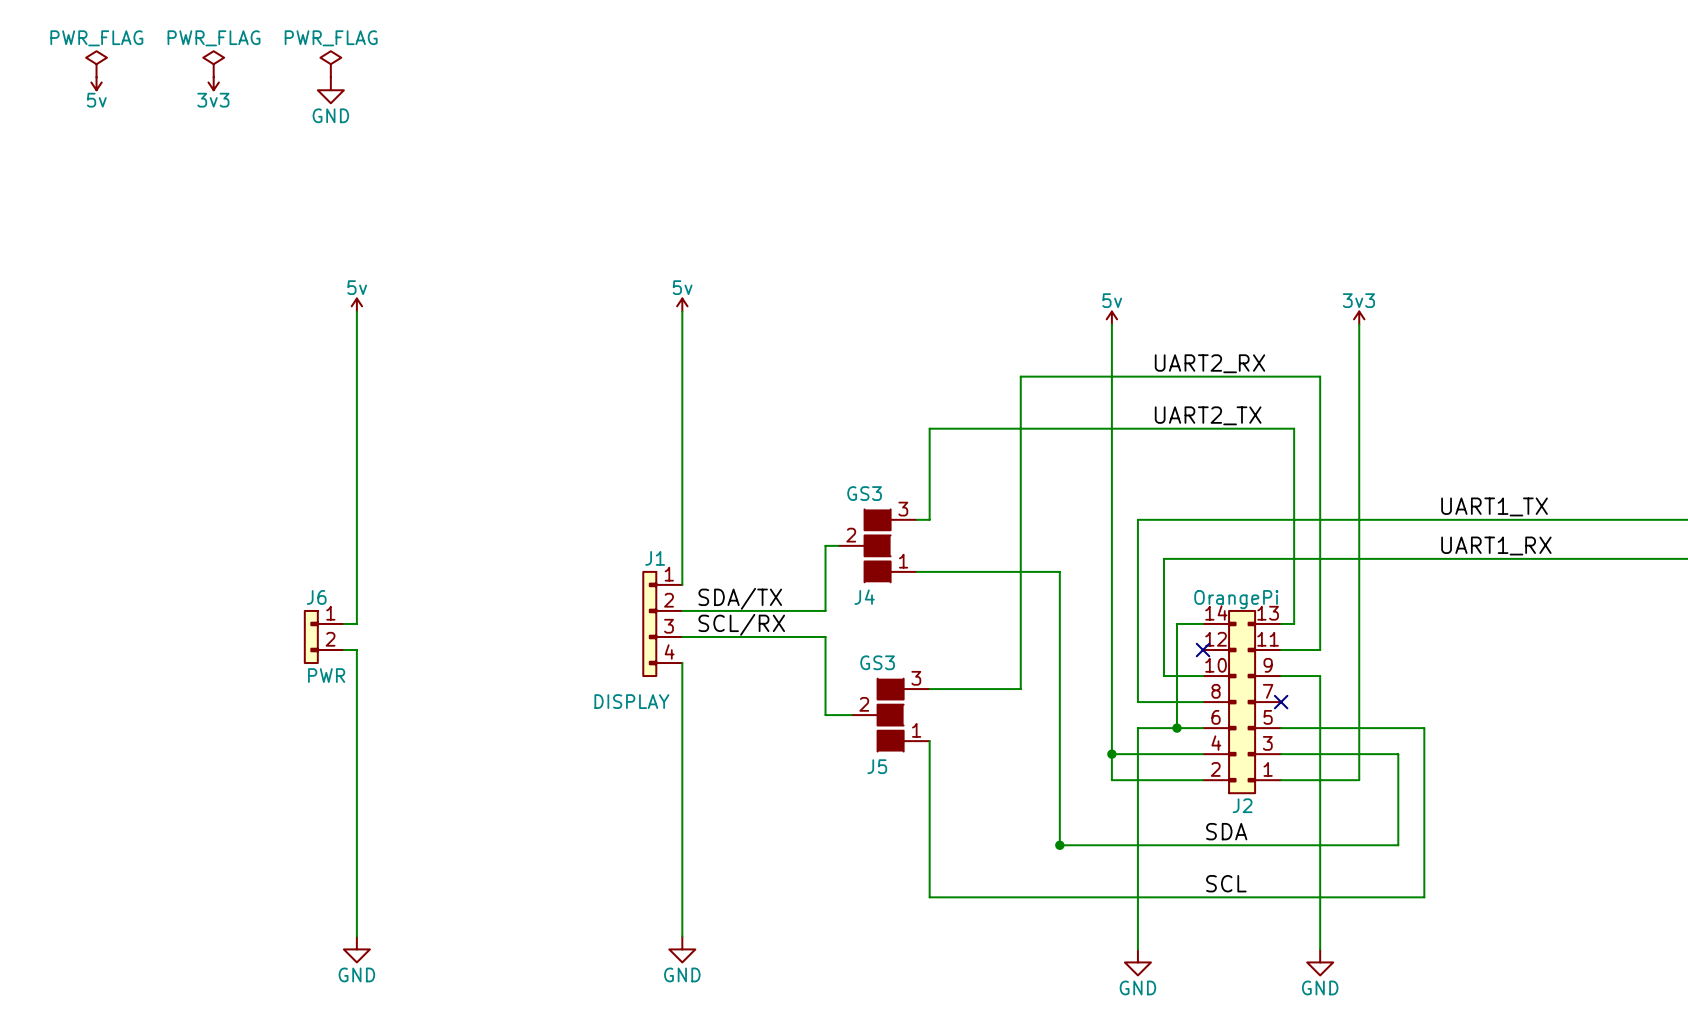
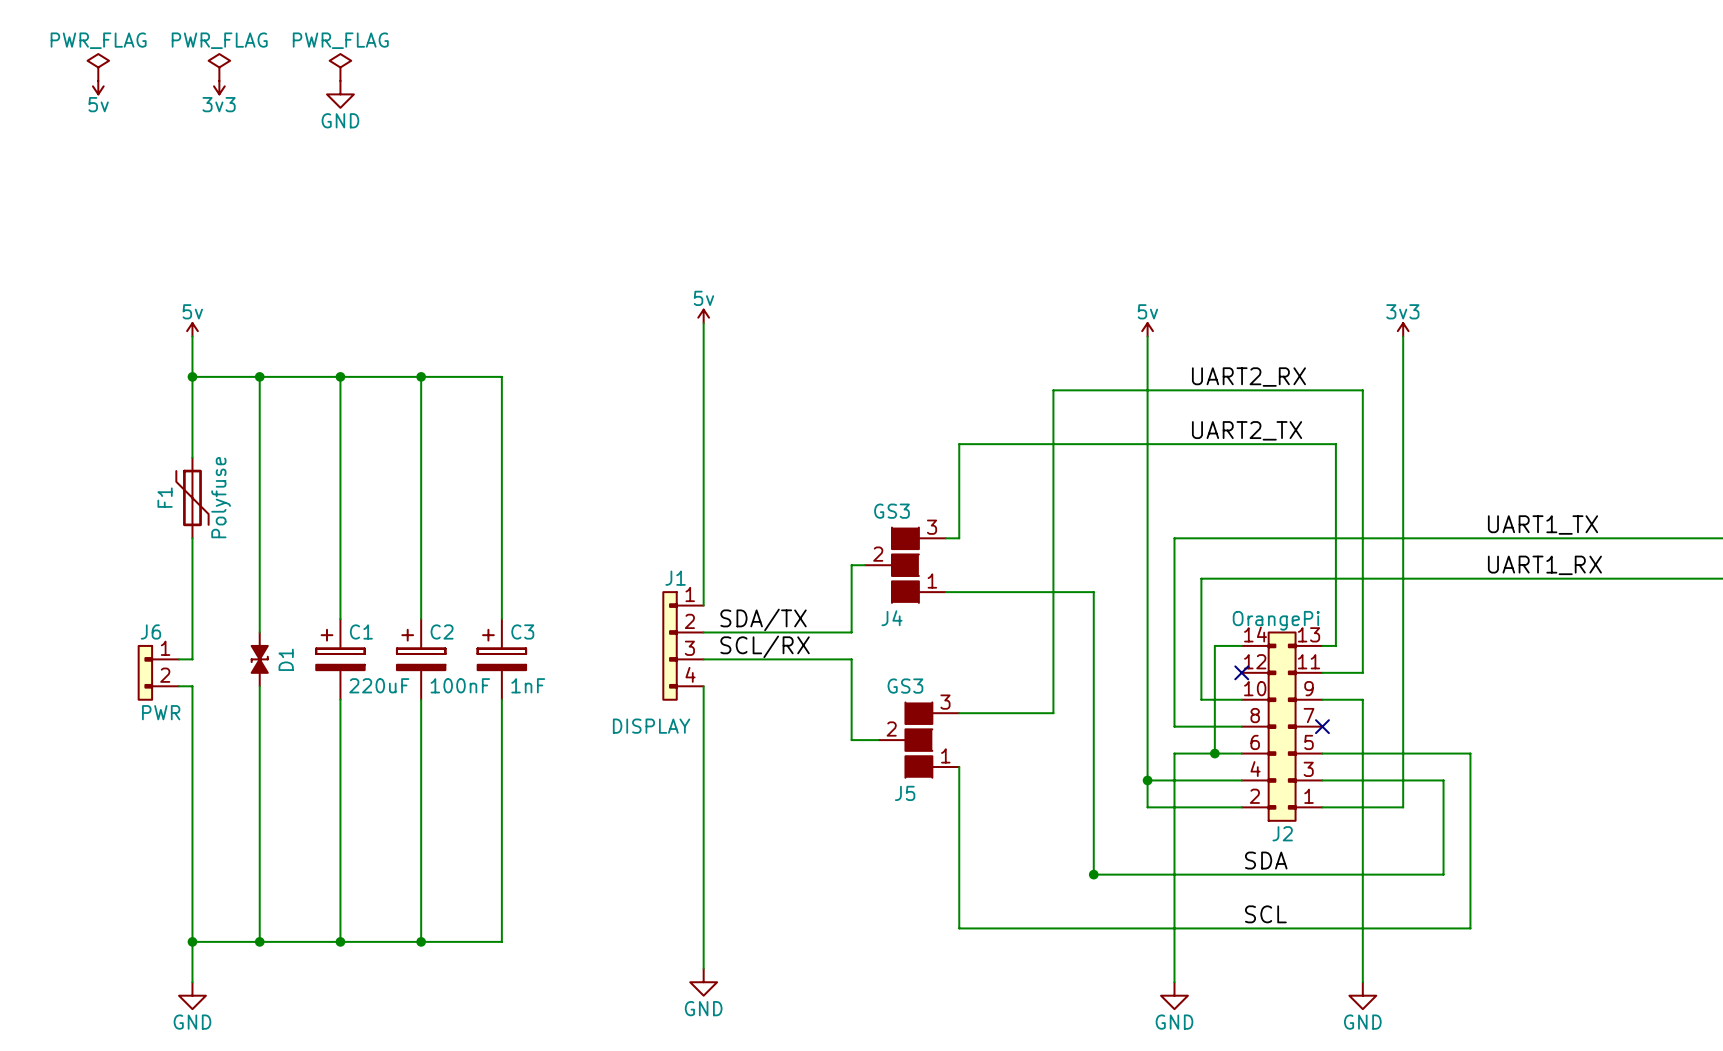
power symbol position: 5v (356, 305) -> 5v (192, 329)
wire: (356, 311) (356, 623) (343, 623) -> none
wire: none -> (192, 336) (192, 457)
wire: none -> (192, 376) (501, 376) (501, 619)
junction: none -> (192, 376)
wire: none -> (259, 376) (259, 632)
junction: none -> (259, 376)
wire: none -> (340, 376) (340, 619)
junction: none -> (340, 376)
wire: none -> (421, 376) (421, 619)
junction: none -> (421, 376)
F1: none -> Polyfuse (192, 497)
wire: none -> (192, 538) (192, 659) (179, 659)
D1: none -> (259, 659)
J6 position: (324, 636) -> (158, 672)
C1: none -> 220uF (340, 659)
C2: none -> 100nF (421, 659)
C3: none -> 1nF (501, 659)
wire: (343, 650) (356, 650) (356, 936) -> (179, 686) (192, 686) (192, 982)
wire: none -> (259, 686) (259, 941)
wire: none -> (340, 699) (340, 941)
wire: none -> (421, 699) (421, 941)
wire: none -> (501, 699) (501, 941) (192, 941)
junction: none -> (192, 941)
junction: none -> (259, 941)
junction: none -> (340, 941)
junction: none -> (421, 941)
power symbol position: GND (356, 949) -> GND (192, 995)

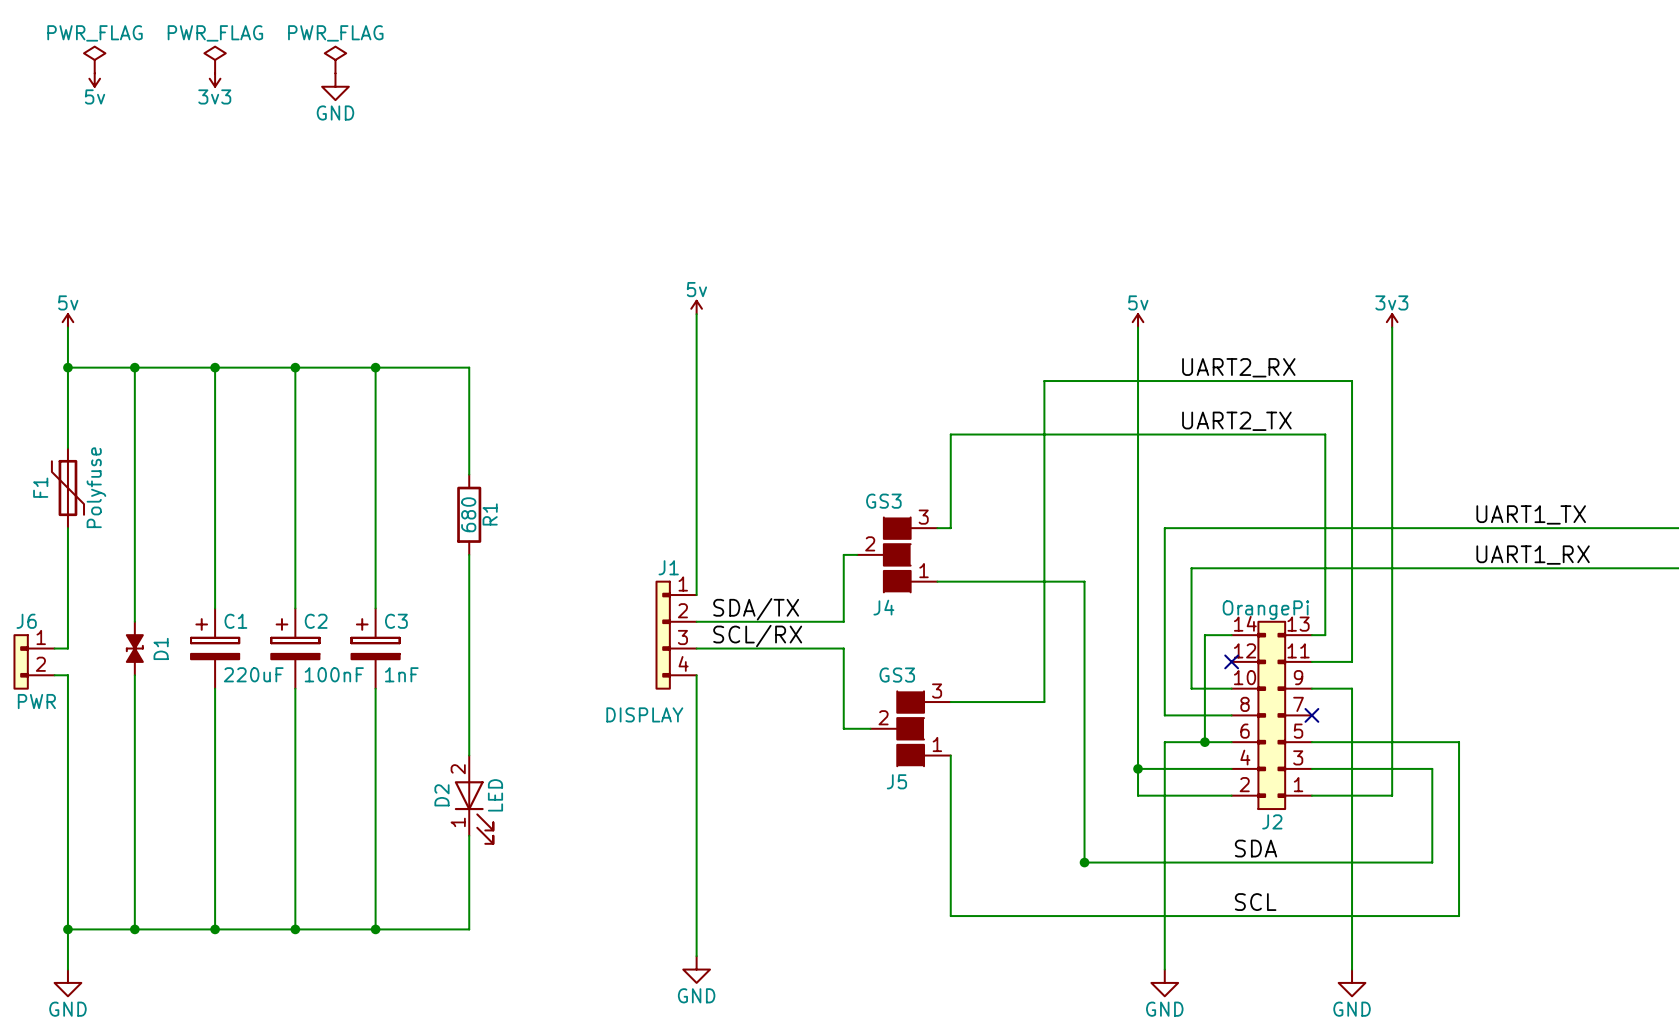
power symbol position: 5v (192, 329) -> 5v (67, 320)
wire: (192, 336) (192, 457) -> (67, 327) (67, 447)
wire: none -> (67, 367) (188, 367)
junction: none -> (67, 367)
junction: none -> (134, 367)
junction: (192, 376) -> none
junction: none -> (215, 367)
wire: (259, 376) (259, 632) -> (134, 367) (134, 621)
junction: (259, 376) -> none
junction: none -> (295, 367)
wire: (340, 376) (340, 619) -> (215, 367) (215, 608)
junction: (340, 376) -> none
wire: none -> (375, 367) (375, 608)
junction: none -> (375, 367)
wire: (421, 376) (421, 619) -> (295, 367) (295, 608)
junction: (421, 376) -> none
wire: (474, 376) (501, 376) (501, 619) -> (469, 367) (469, 474)
F1 position: (192, 497) -> (67, 488)
R1: none -> 680 (469, 514)
wire: (192, 538) (192, 659) (179, 659) -> (67, 528) (67, 648) (54, 648)
wire: none -> (469, 554) (469, 755)
D1 position: (259, 659) -> (134, 648)
C1 position: (340, 659) -> (215, 648)
C2 position: (421, 659) -> (295, 648)
C3 position: (501, 659) -> (375, 648)
J6 position: (158, 672) -> (34, 661)
wire: (179, 686) (192, 686) (192, 982) -> (54, 675) (67, 675) (67, 969)
wire: (259, 686) (259, 941) -> (134, 675) (134, 929)
wire: (340, 699) (340, 941) -> (215, 688) (215, 929)
wire: none -> (375, 688) (375, 929)
wire: (421, 699) (421, 941) -> (295, 688) (295, 929)
wire: (501, 699) (501, 941) (474, 941) -> (469, 835) (469, 929)
D2: none -> LED (474, 799)
wire: none -> (67, 929) (188, 929)
junction: none -> (67, 929)
junction: none -> (134, 929)
junction: (192, 941) -> none
junction: none -> (215, 929)
junction: (259, 941) -> none
junction: none -> (295, 929)
junction: (340, 941) -> none
junction: none -> (375, 929)
junction: (421, 941) -> none
power symbol position: GND (192, 995) -> GND (67, 982)

